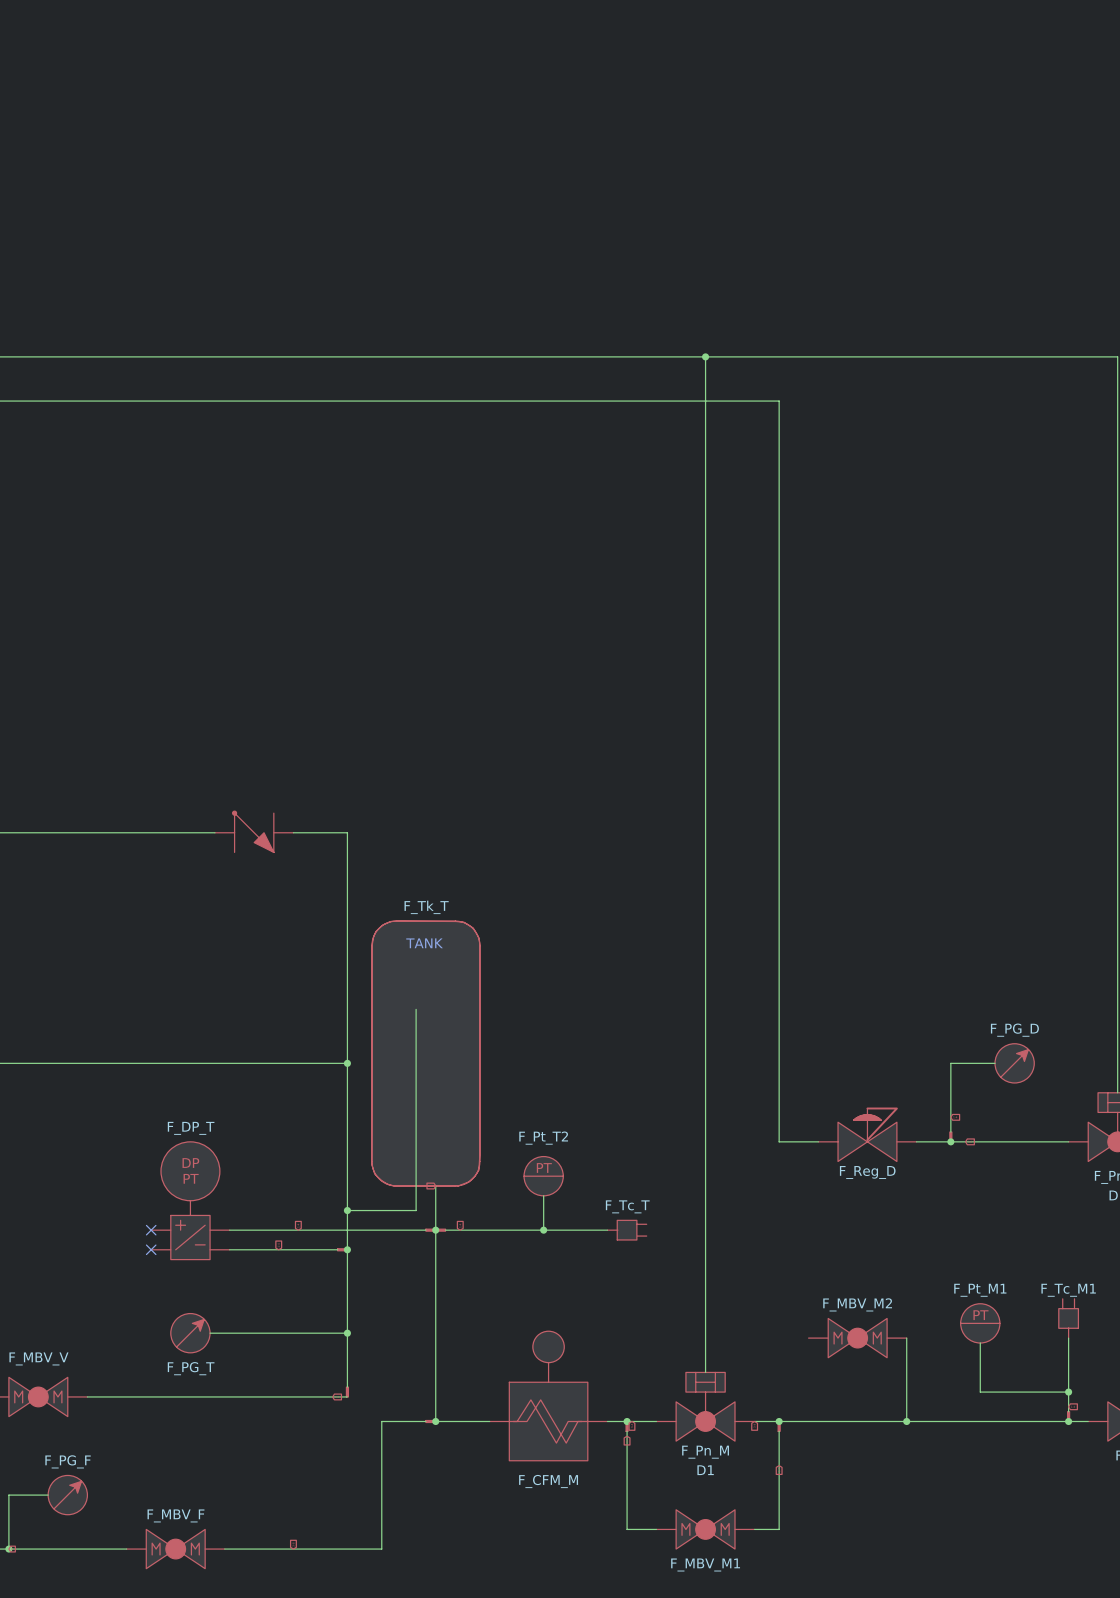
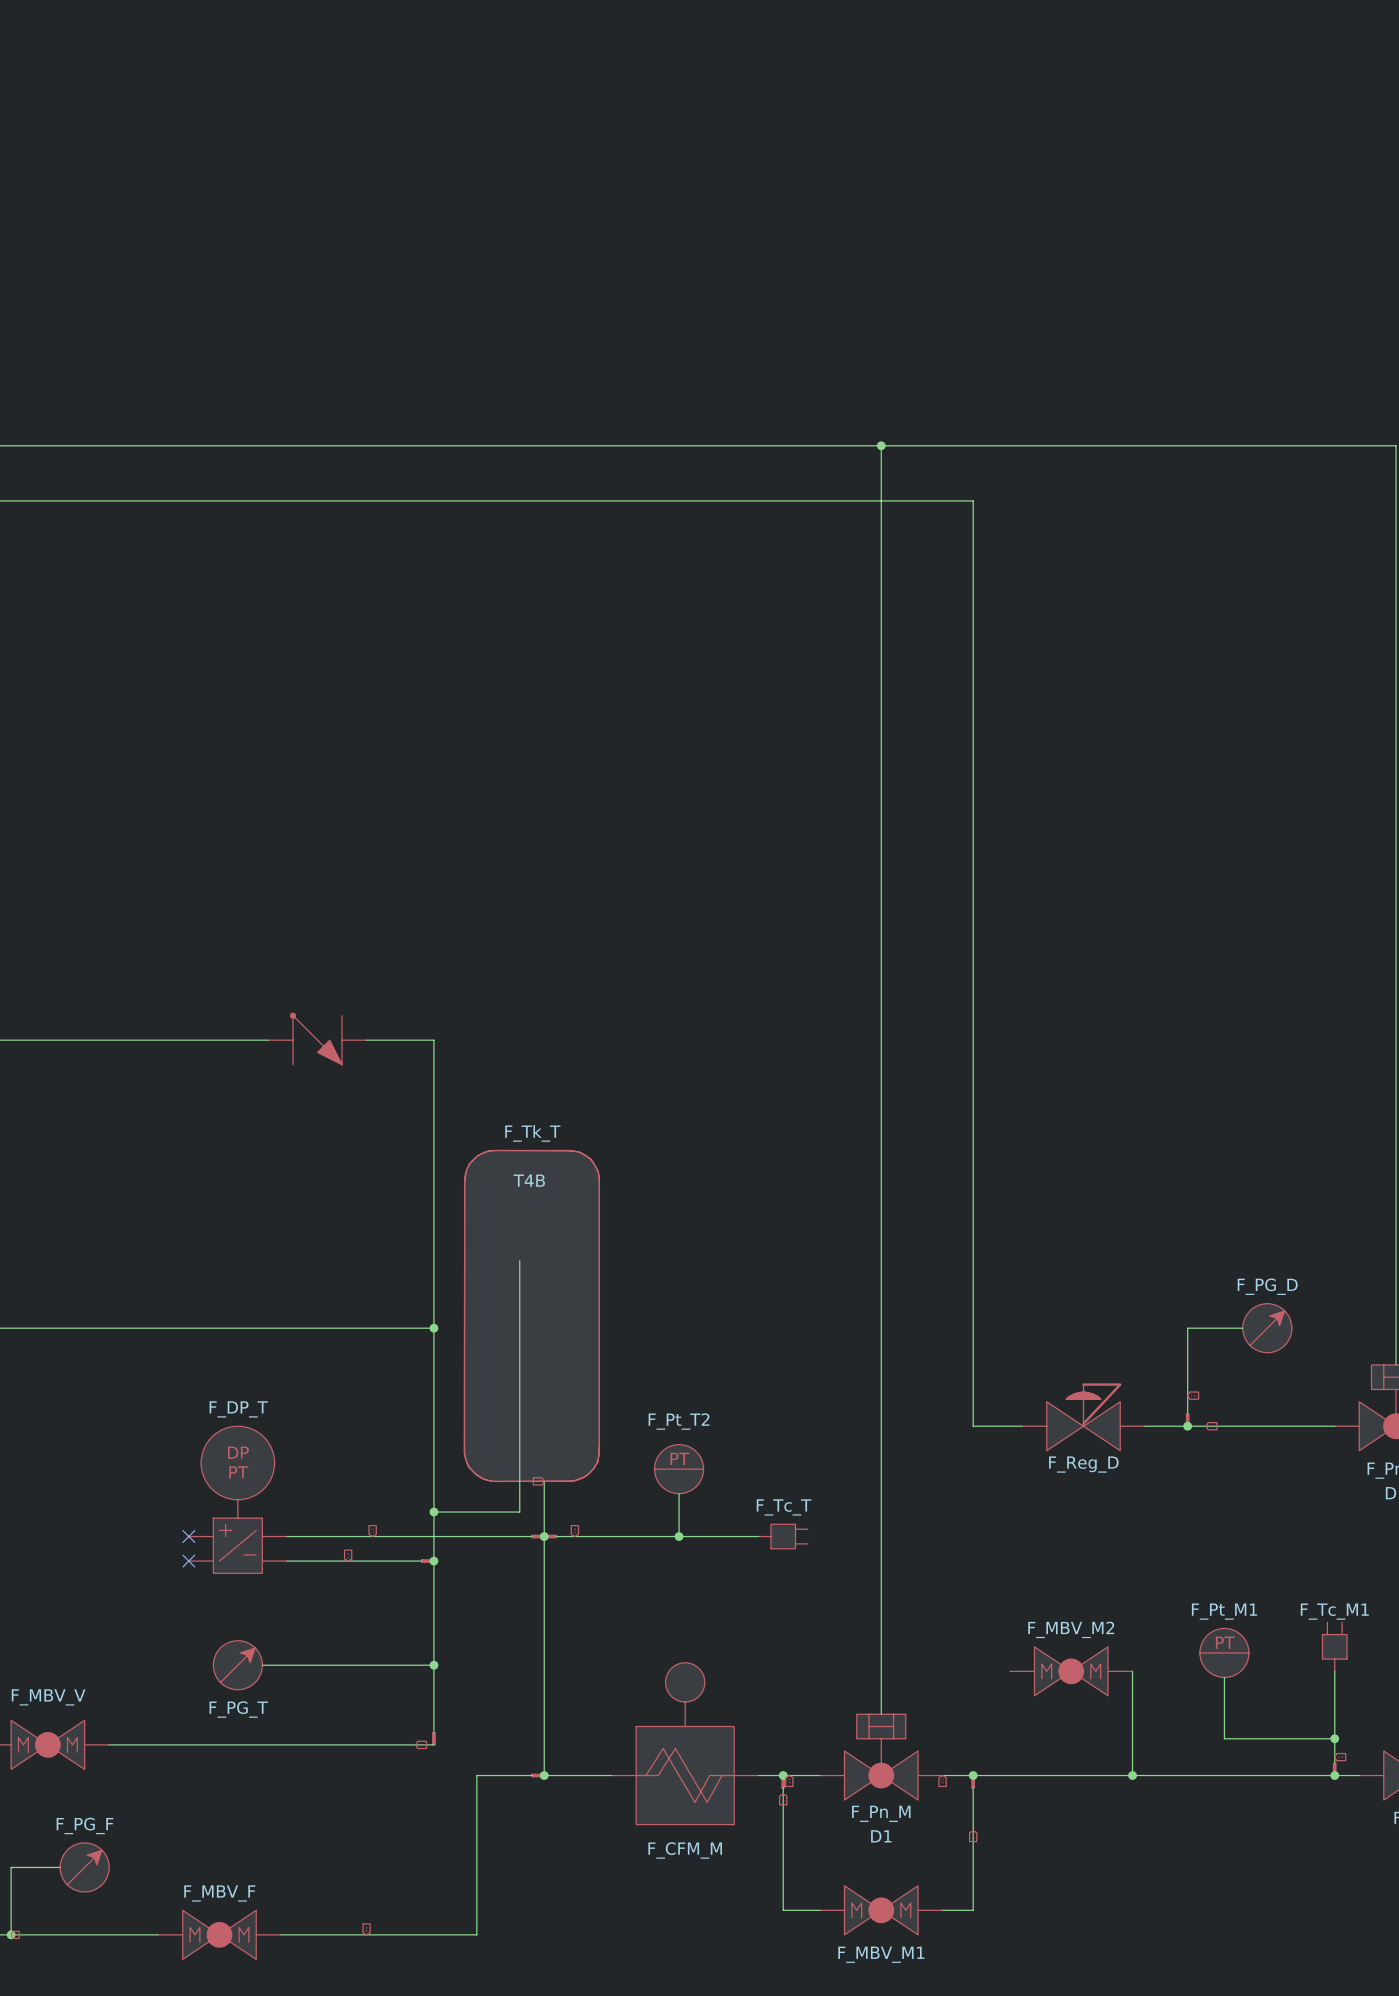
text: TANK (424, 943) -> none
T4B name: none -> T4B (529, 1180)

